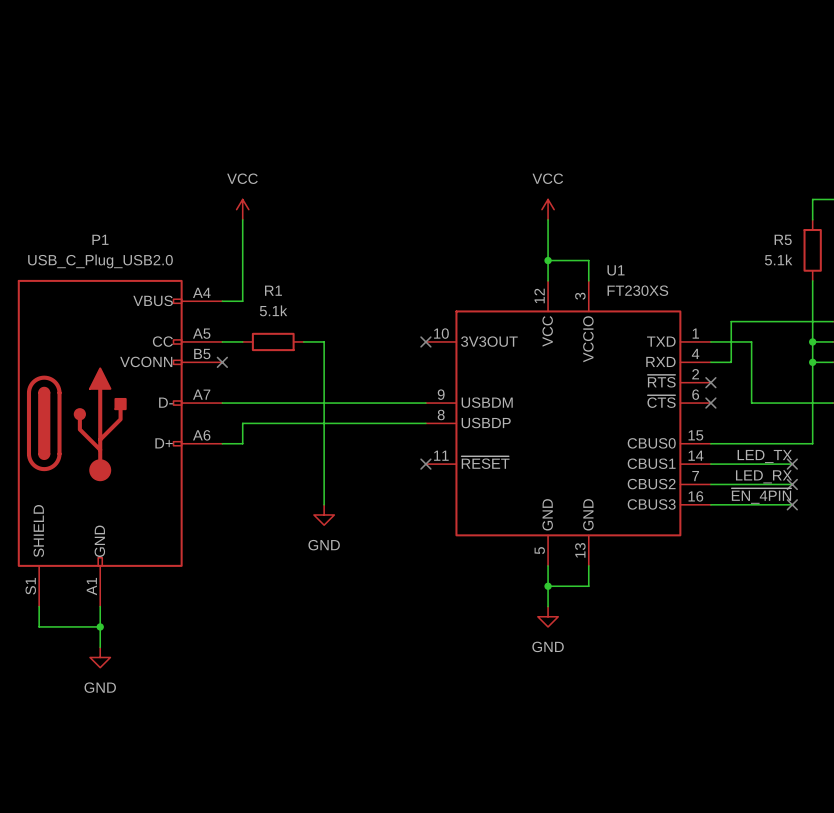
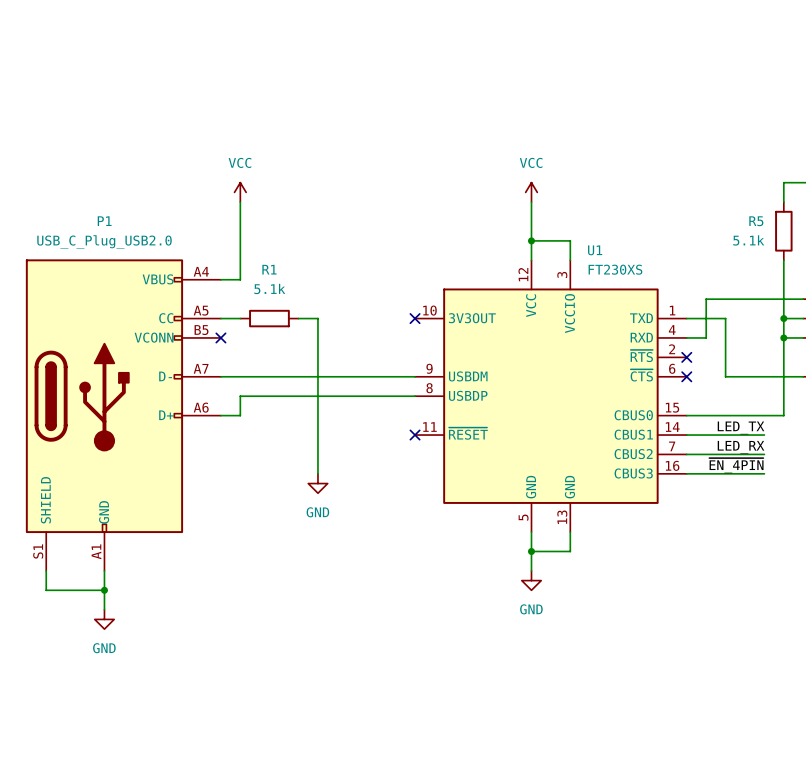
no-connect mark: (792, 464) -> none
no-connect mark: (792, 484) -> none
no-connect mark: (792, 504) -> none

